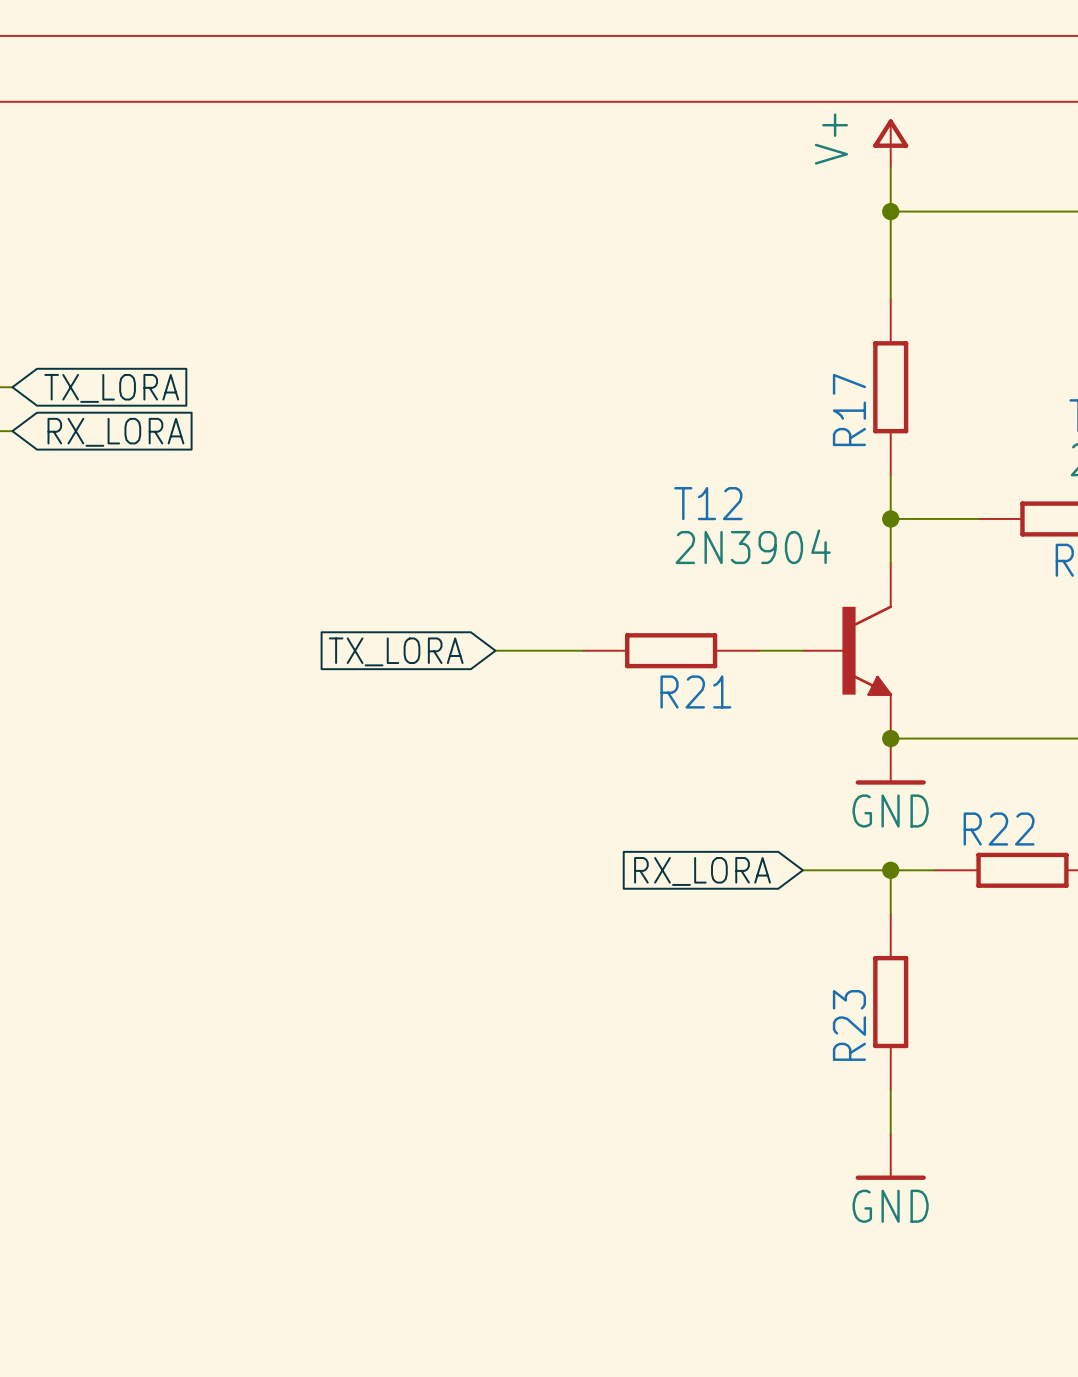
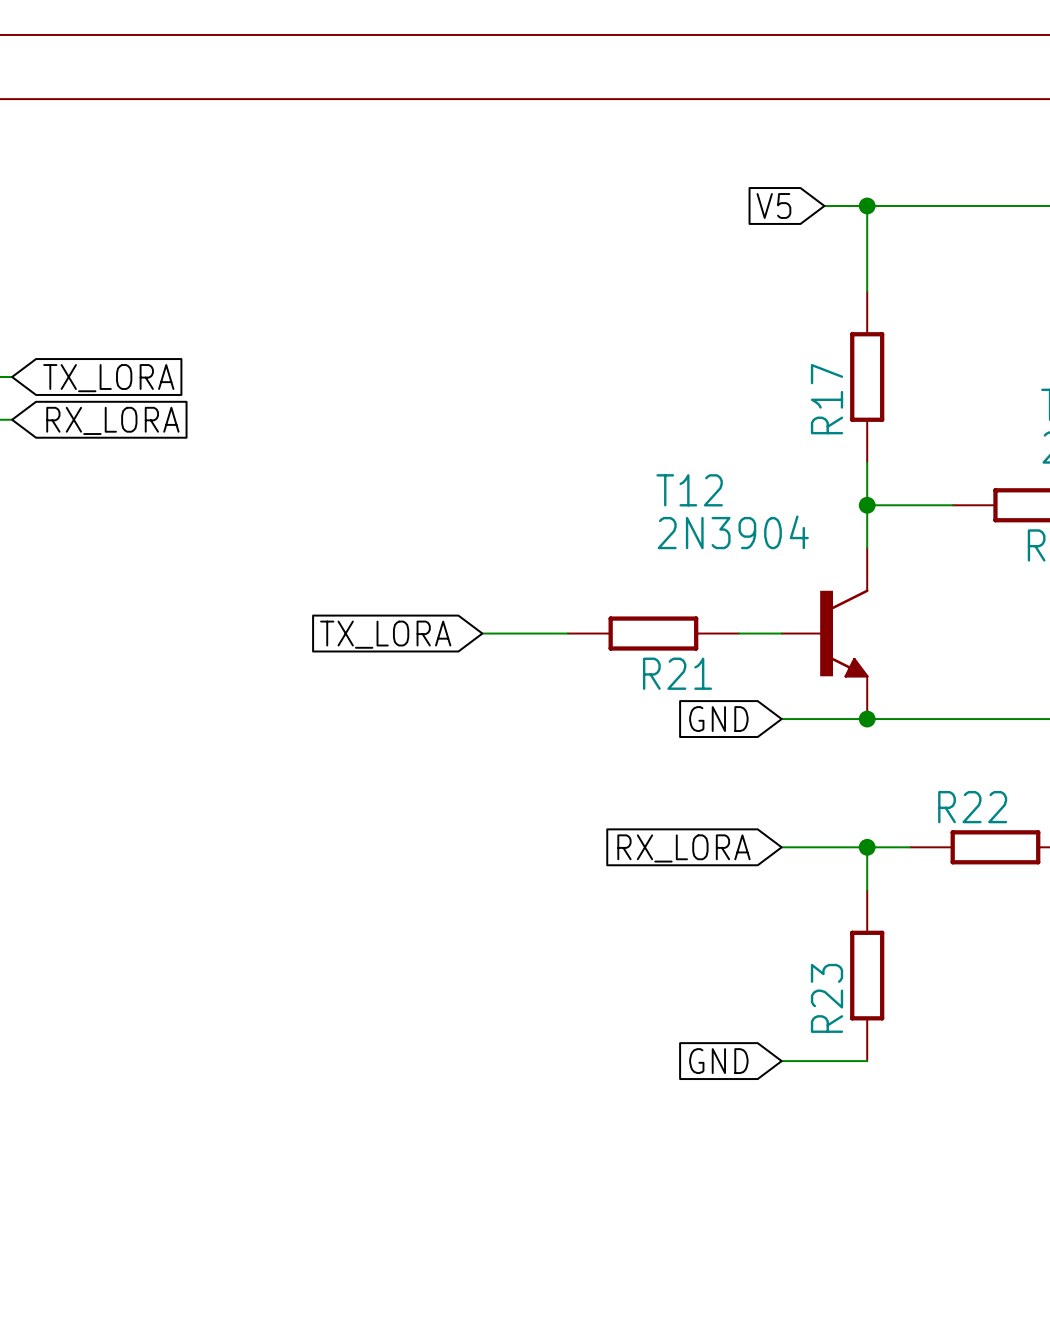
power symbol: V+ (890, 143) -> none
wire: (890, 167) (890, 211) -> (824, 205) (867, 205)
global label: none -> V5 (773, 205)
global label: none -> GND (718, 719)
wire: none -> (781, 719) (867, 719)
power symbol: GND (890, 761) -> none
global label: none -> GND (718, 1061)
wire: (890, 1089) (890, 1133) -> (867, 1061) (781, 1061)
power symbol: GND (890, 1156) -> none

